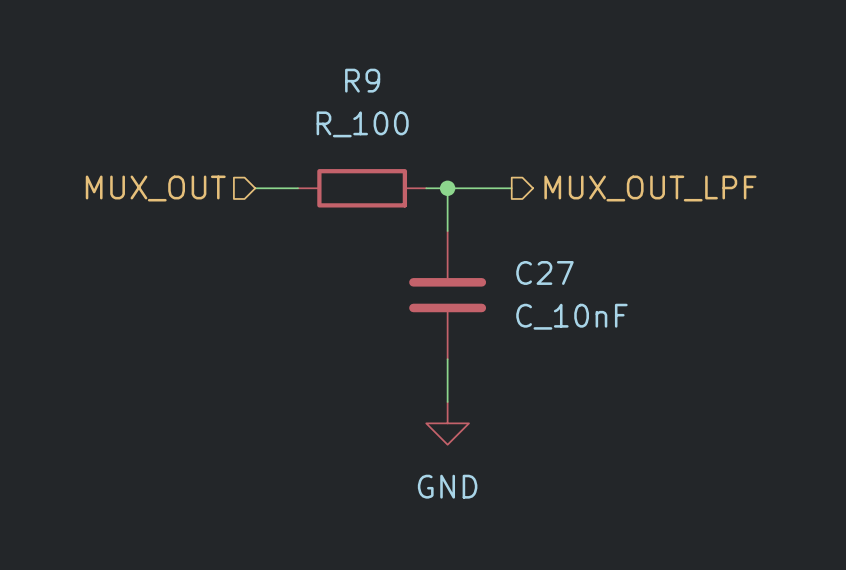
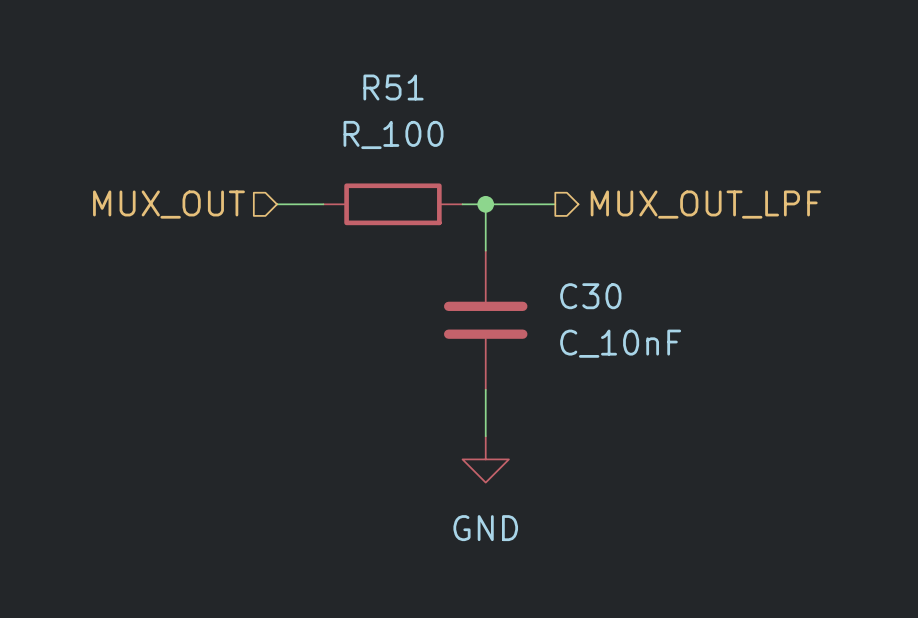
R9 name: R9 (362, 80) -> R51 (393, 87)
C27 name: C27 (544, 272) -> C30 (590, 296)

